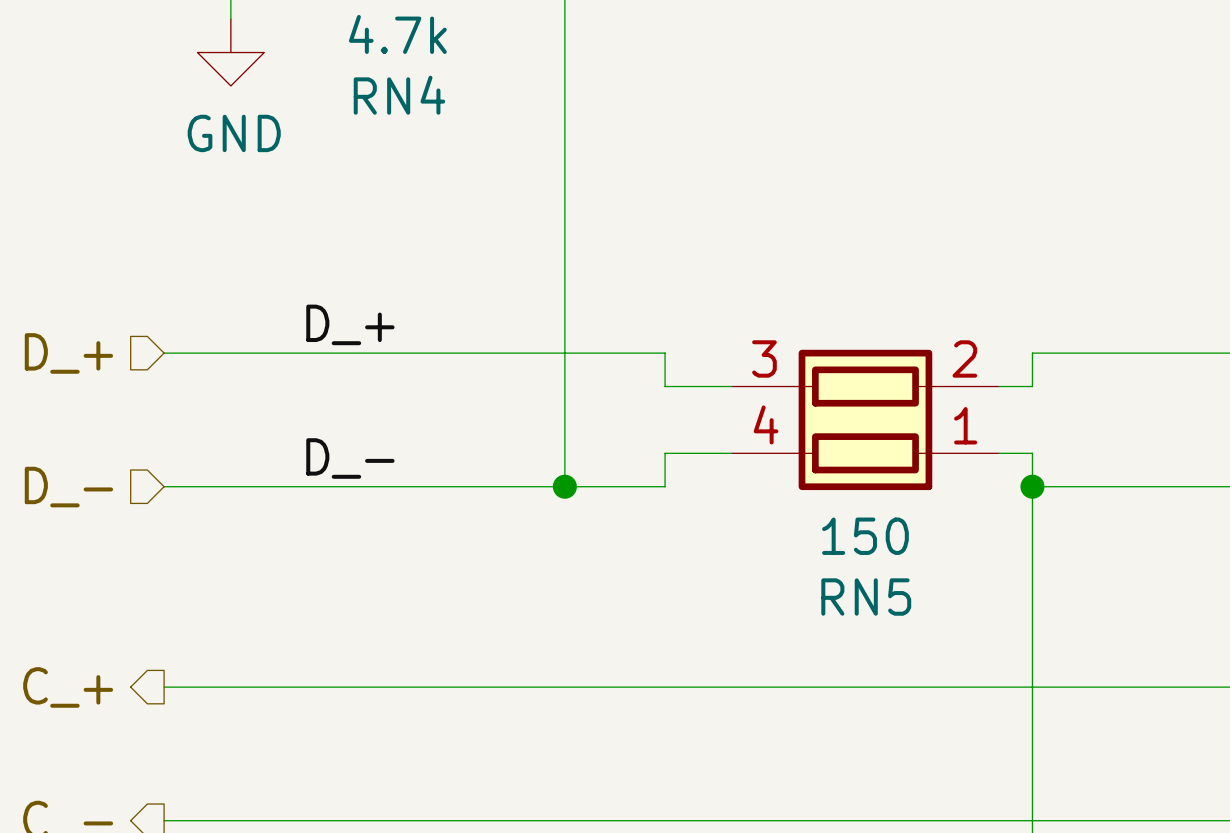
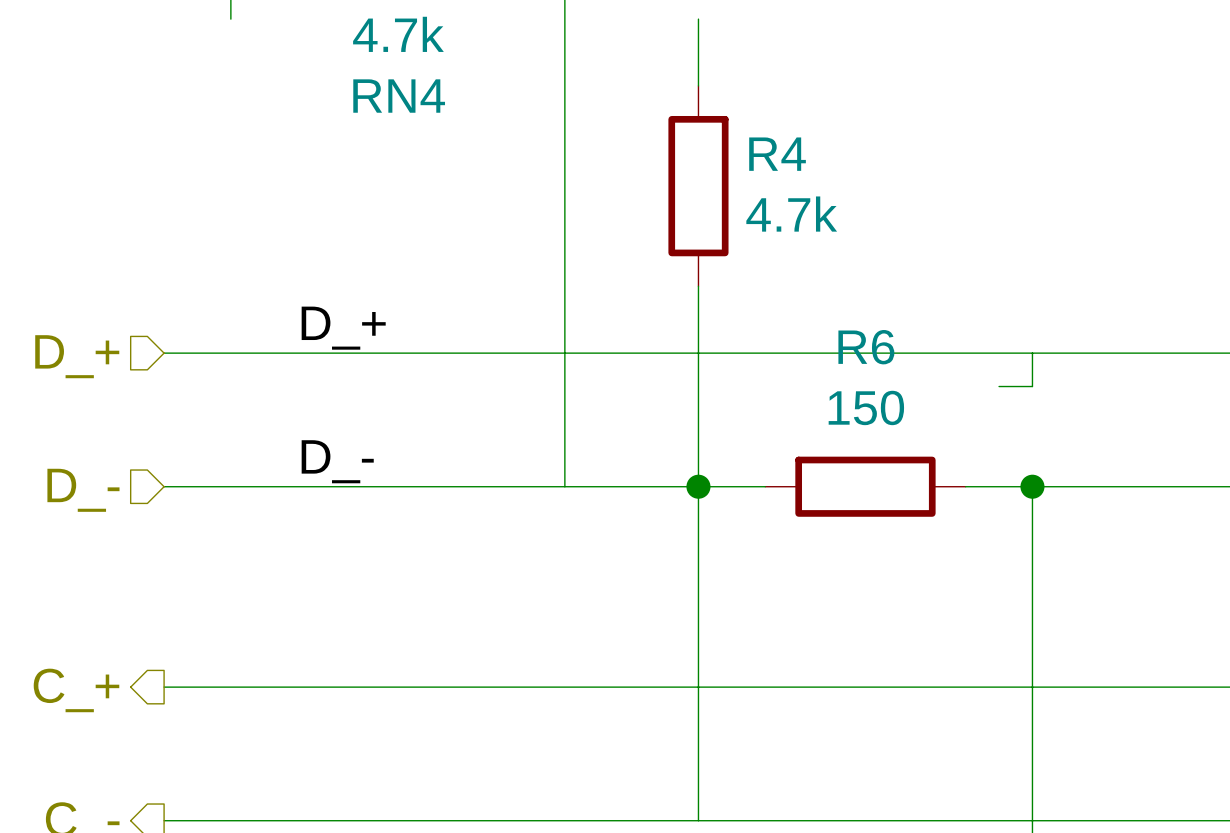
wire: none -> (698, 19) (698, 85)
power symbol: GND (230, 52) -> none
R4: none -> 4.7k (698, 186)
wire: none -> (698, 286) (698, 820)
wire: (665, 353) (665, 386) (731, 386) -> (665, 353) (1032, 353)
RN5: 150 (865, 419) -> none
wire: (731, 453) (665, 453) (665, 486) -> (765, 486) (665, 486)
wire: (999, 453) (1032, 453) (1032, 486) -> (965, 486) (1032, 486)
junction position: (564, 486) -> (698, 486)
R6: none -> 150 (865, 486)

